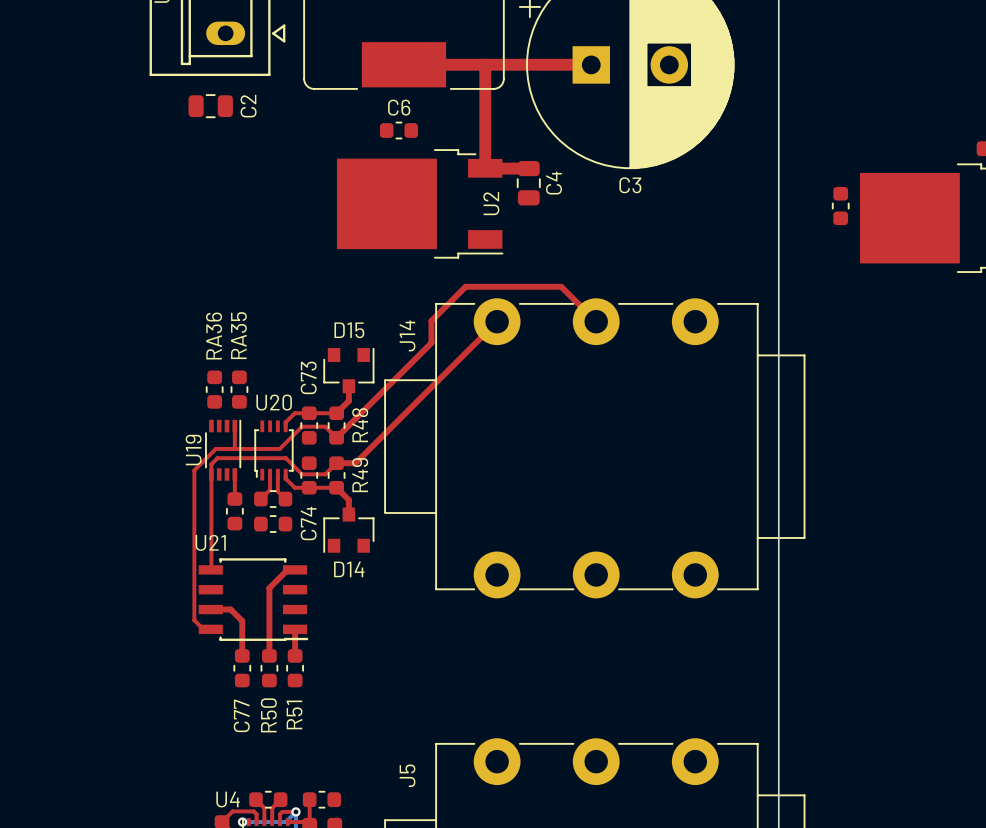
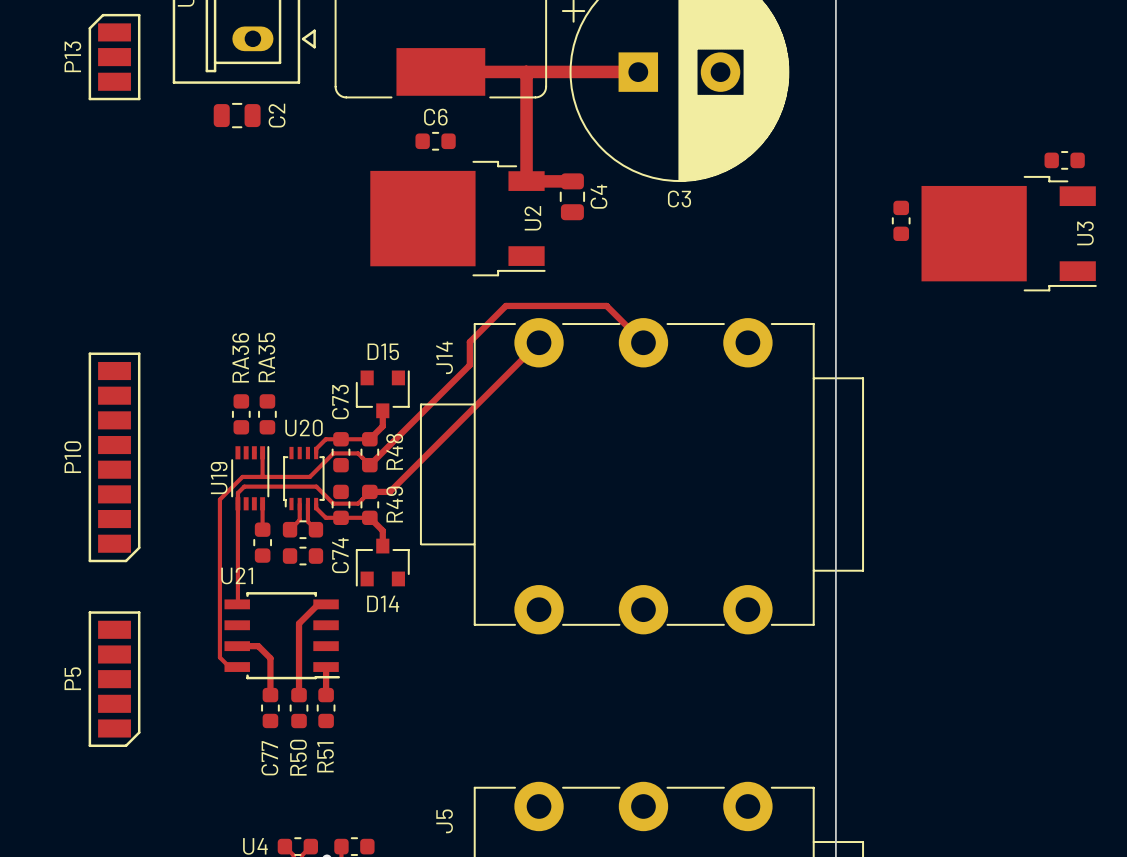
P13: none -> (114, 57)
P10: none -> (114, 457)
P5: none -> (114, 679)

